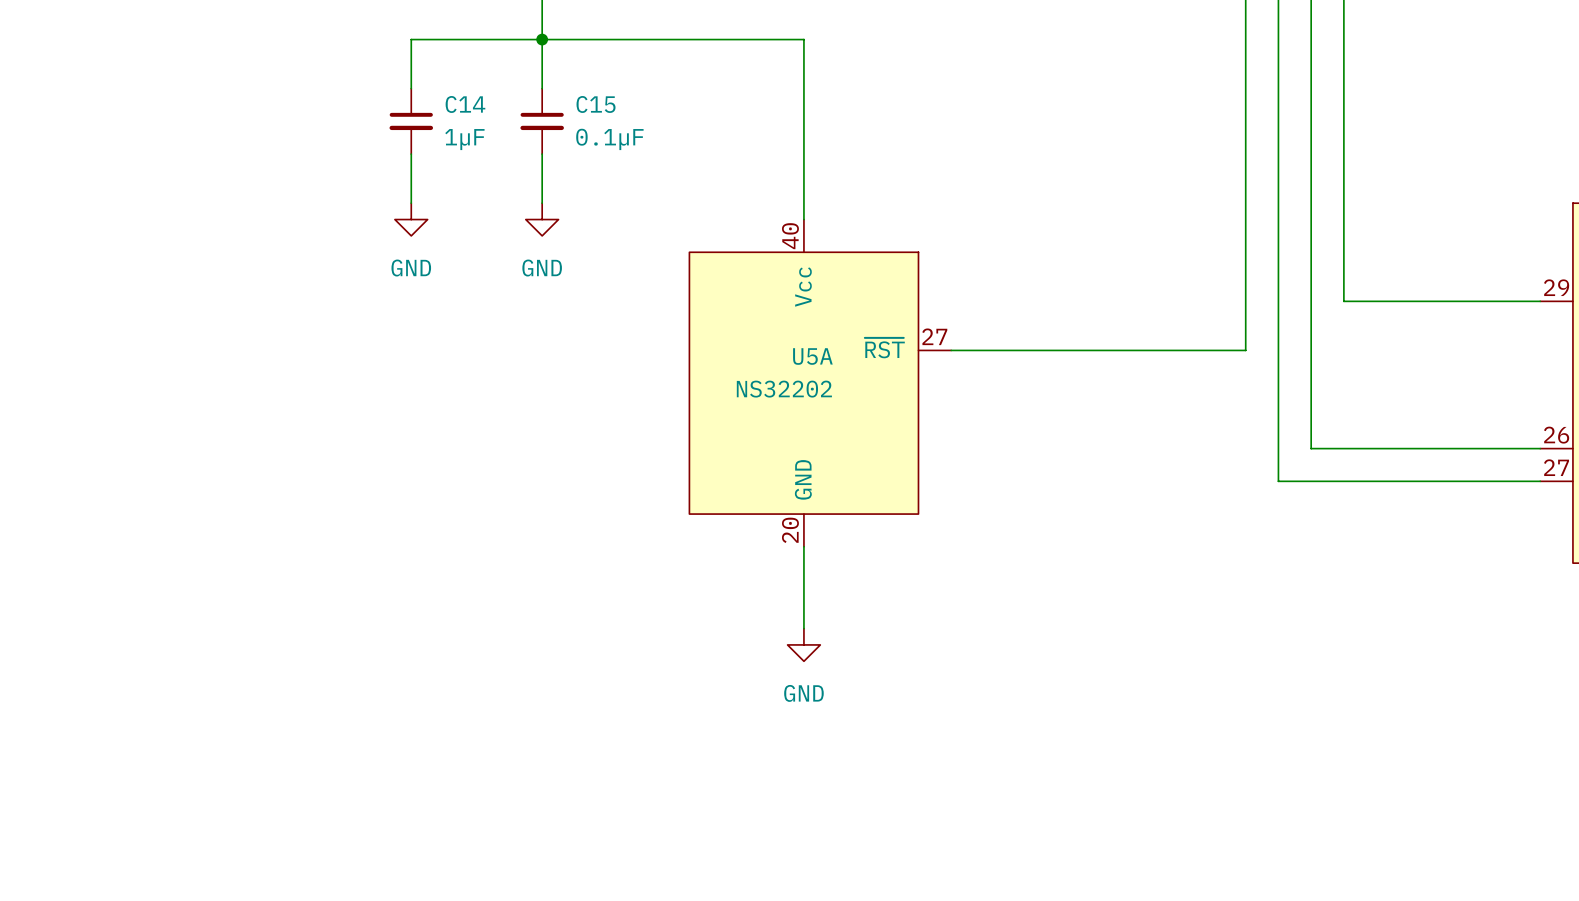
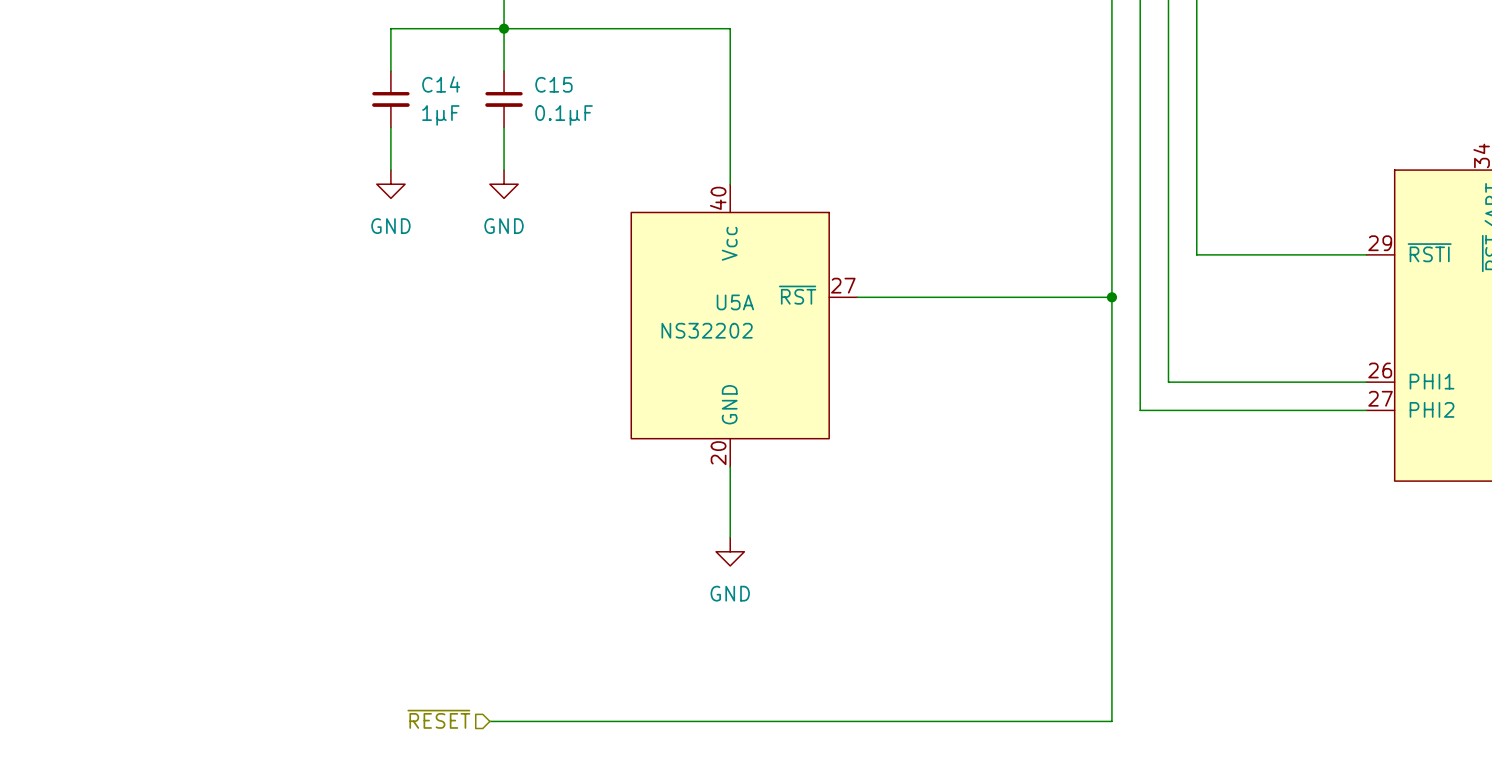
wire: none -> (1111, 297) (1111, 721) (489, 721)
junction: none -> (1111, 297)
hierarchical label: none -> ~{RESET} (438, 719)

